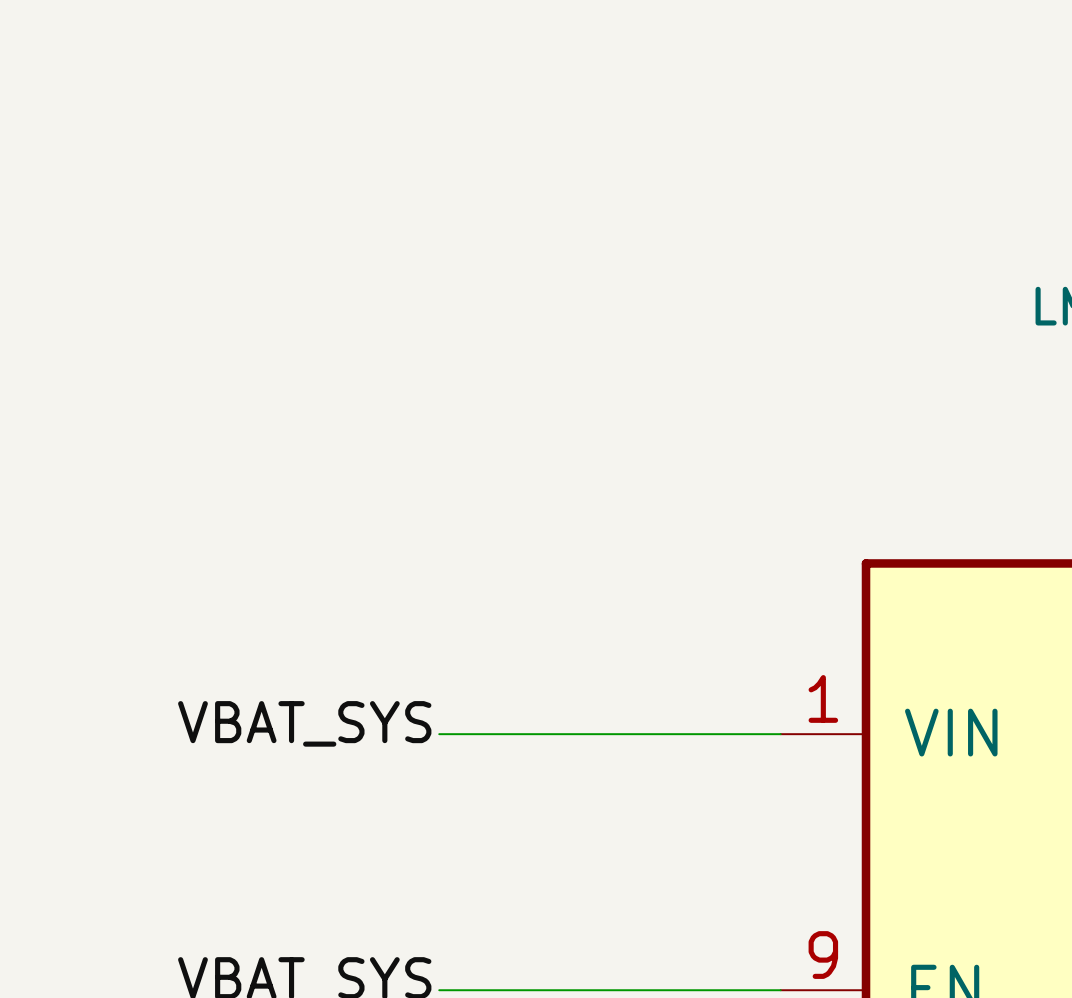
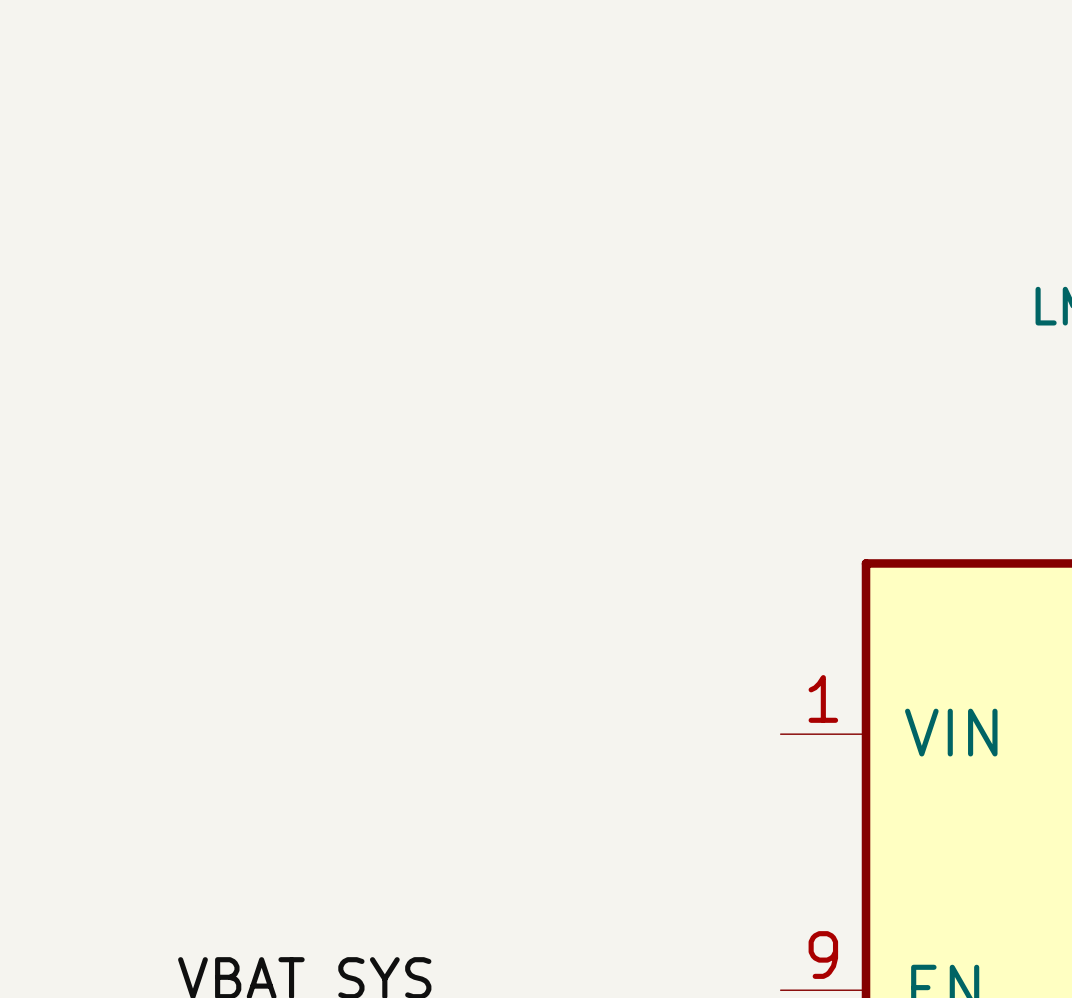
label: VBAT_SYS (304, 723) -> none
wire: (439, 734) (780, 734) -> none
wire: (439, 990) (780, 990) -> none

